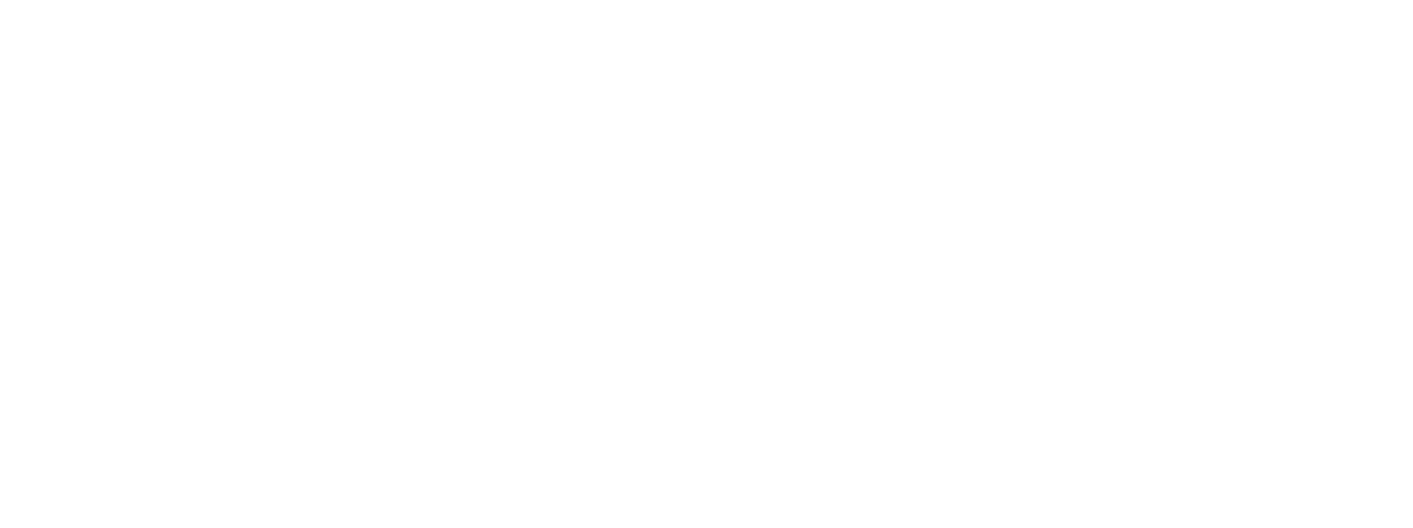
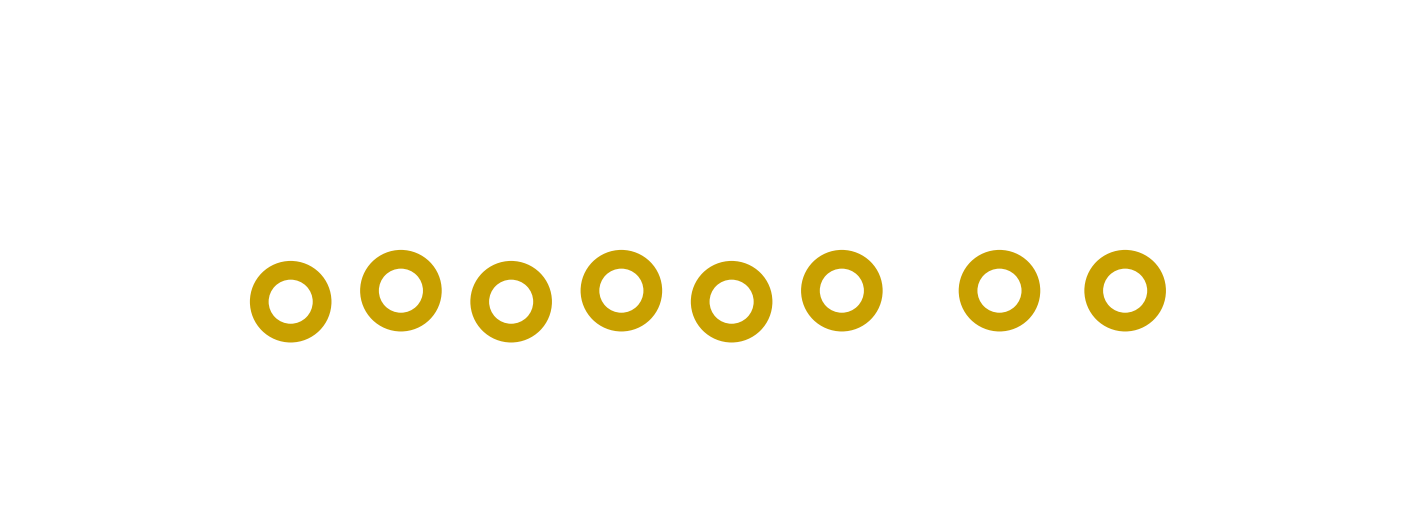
part: none -> (1062, 290)
part: none -> (566, 296)

